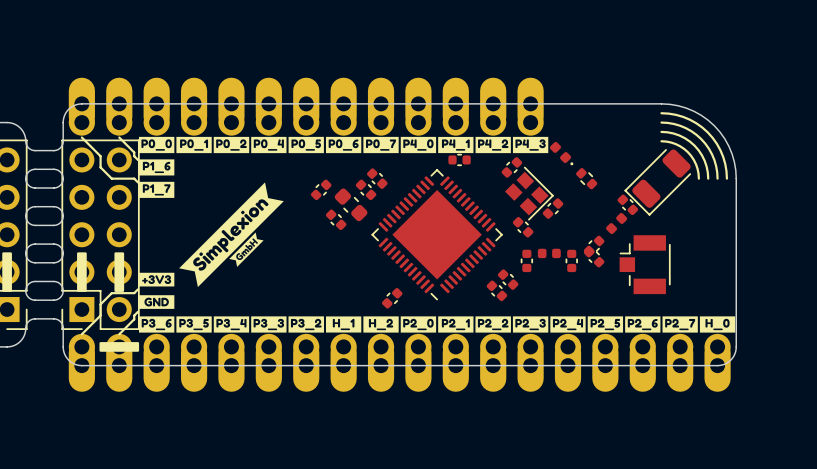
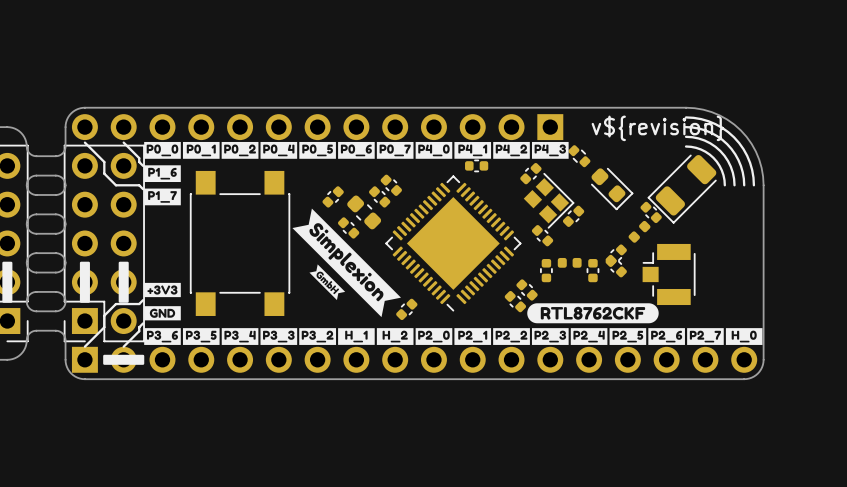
part: (306, 106) -> none
part: none -> (317, 127)
text: none -> v${revision} (657, 128)
part footprint: [549, 141, 574, 166] -> [568, 145, 591, 168]
part footprint: [576, 168, 598, 190] -> [590, 167, 634, 211]
drawing: [179, 182, 284, 288] -> none
drawing: none -> [292, 208, 401, 318]
part: none -> (240, 243)
drawing: none -> [527, 303, 659, 324]
part: none -> (414, 359)
part: (399, 362) -> none

